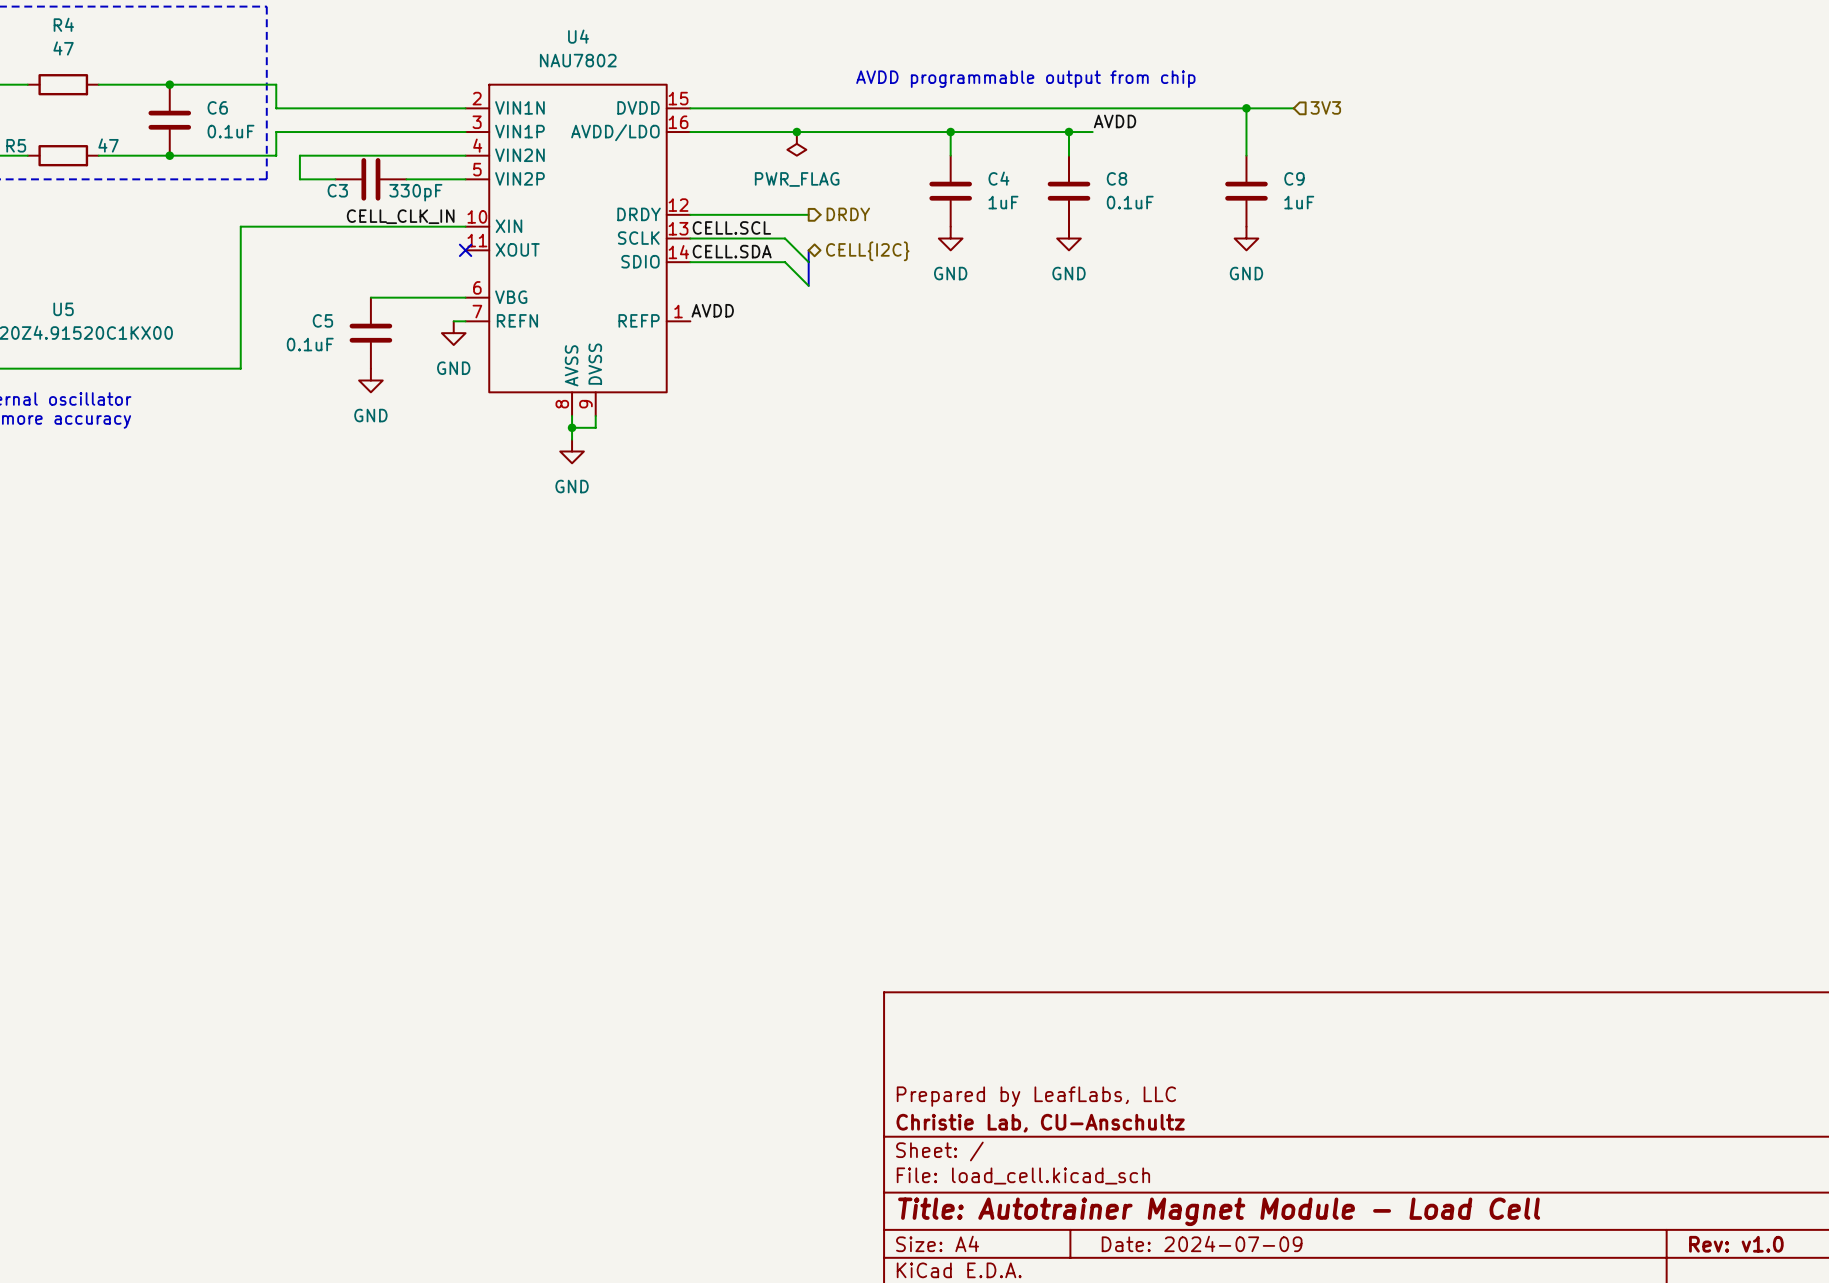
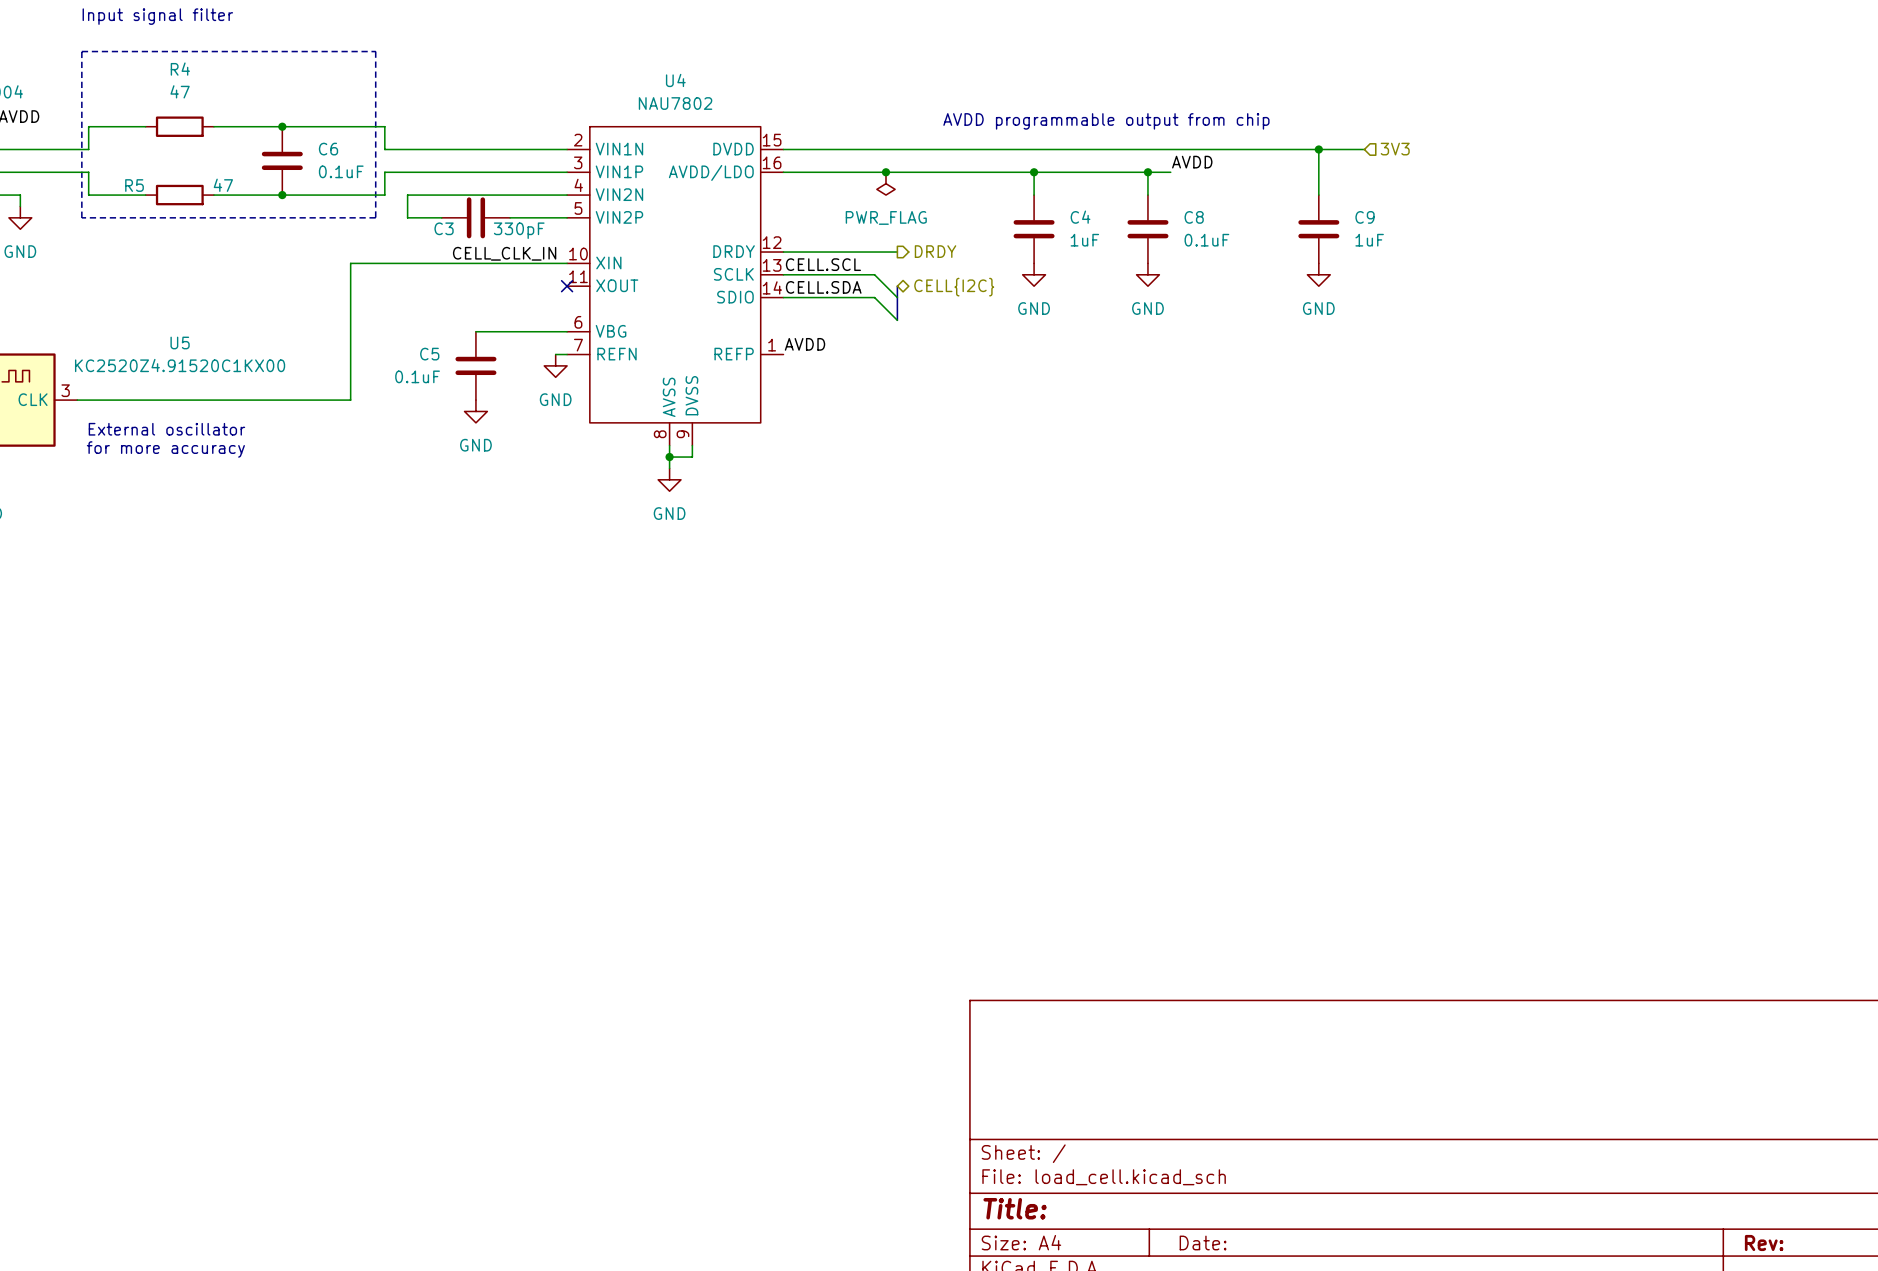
title block: Prepared by LeafLabs, LLC (1036, 1096) -> none
title block: Christie Lab, CU-Anschultz (1040, 1123) -> none
title block: Title: Autotrainer Magnet Module - Load Cell (1219, 1211) -> Title: (1015, 1208)
title block: Date: 2024-07-09 (1202, 1243) -> Date: (1203, 1242)
title block: Rev: v1.0 (1736, 1244) -> Rev: (1764, 1242)

